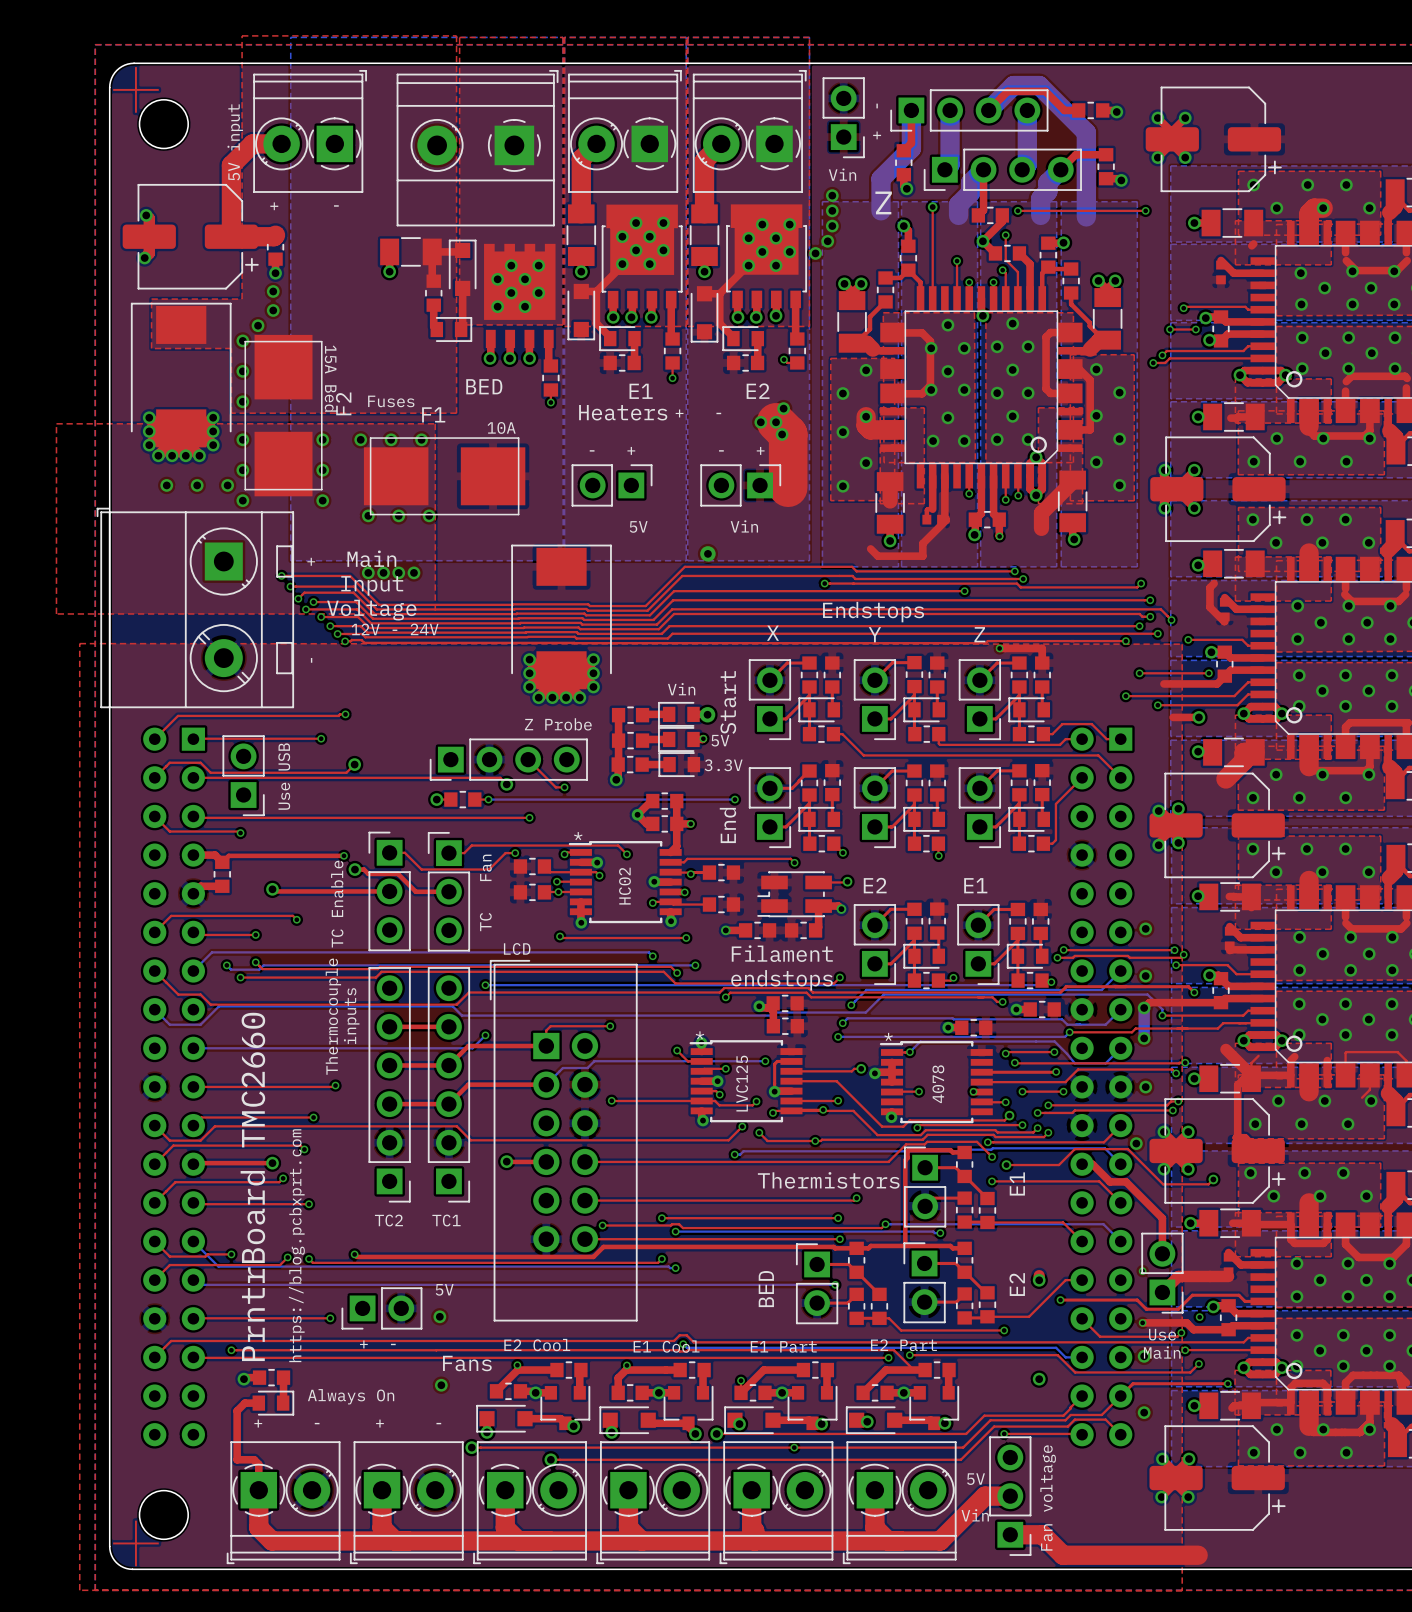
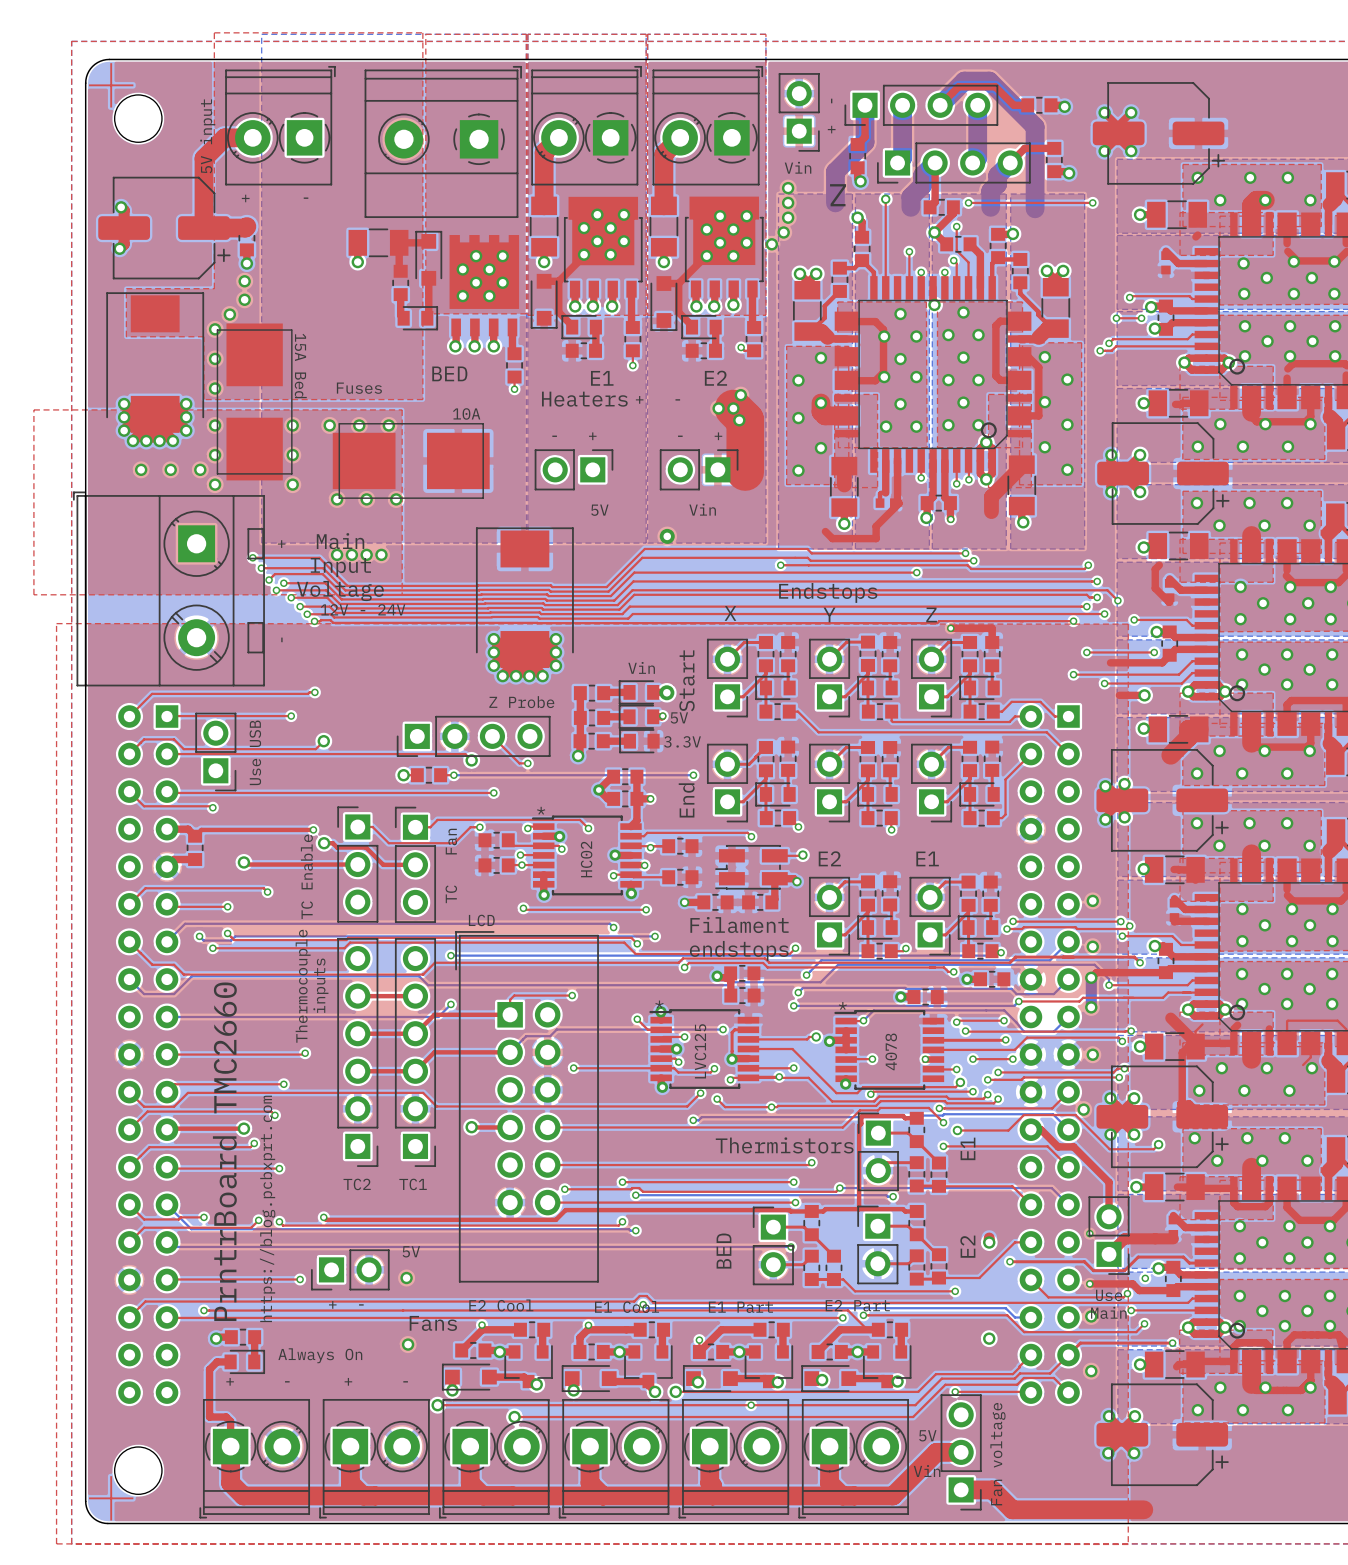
F2 name: F2 (343, 403) -> none
F1 name: F1 (433, 414) -> none

